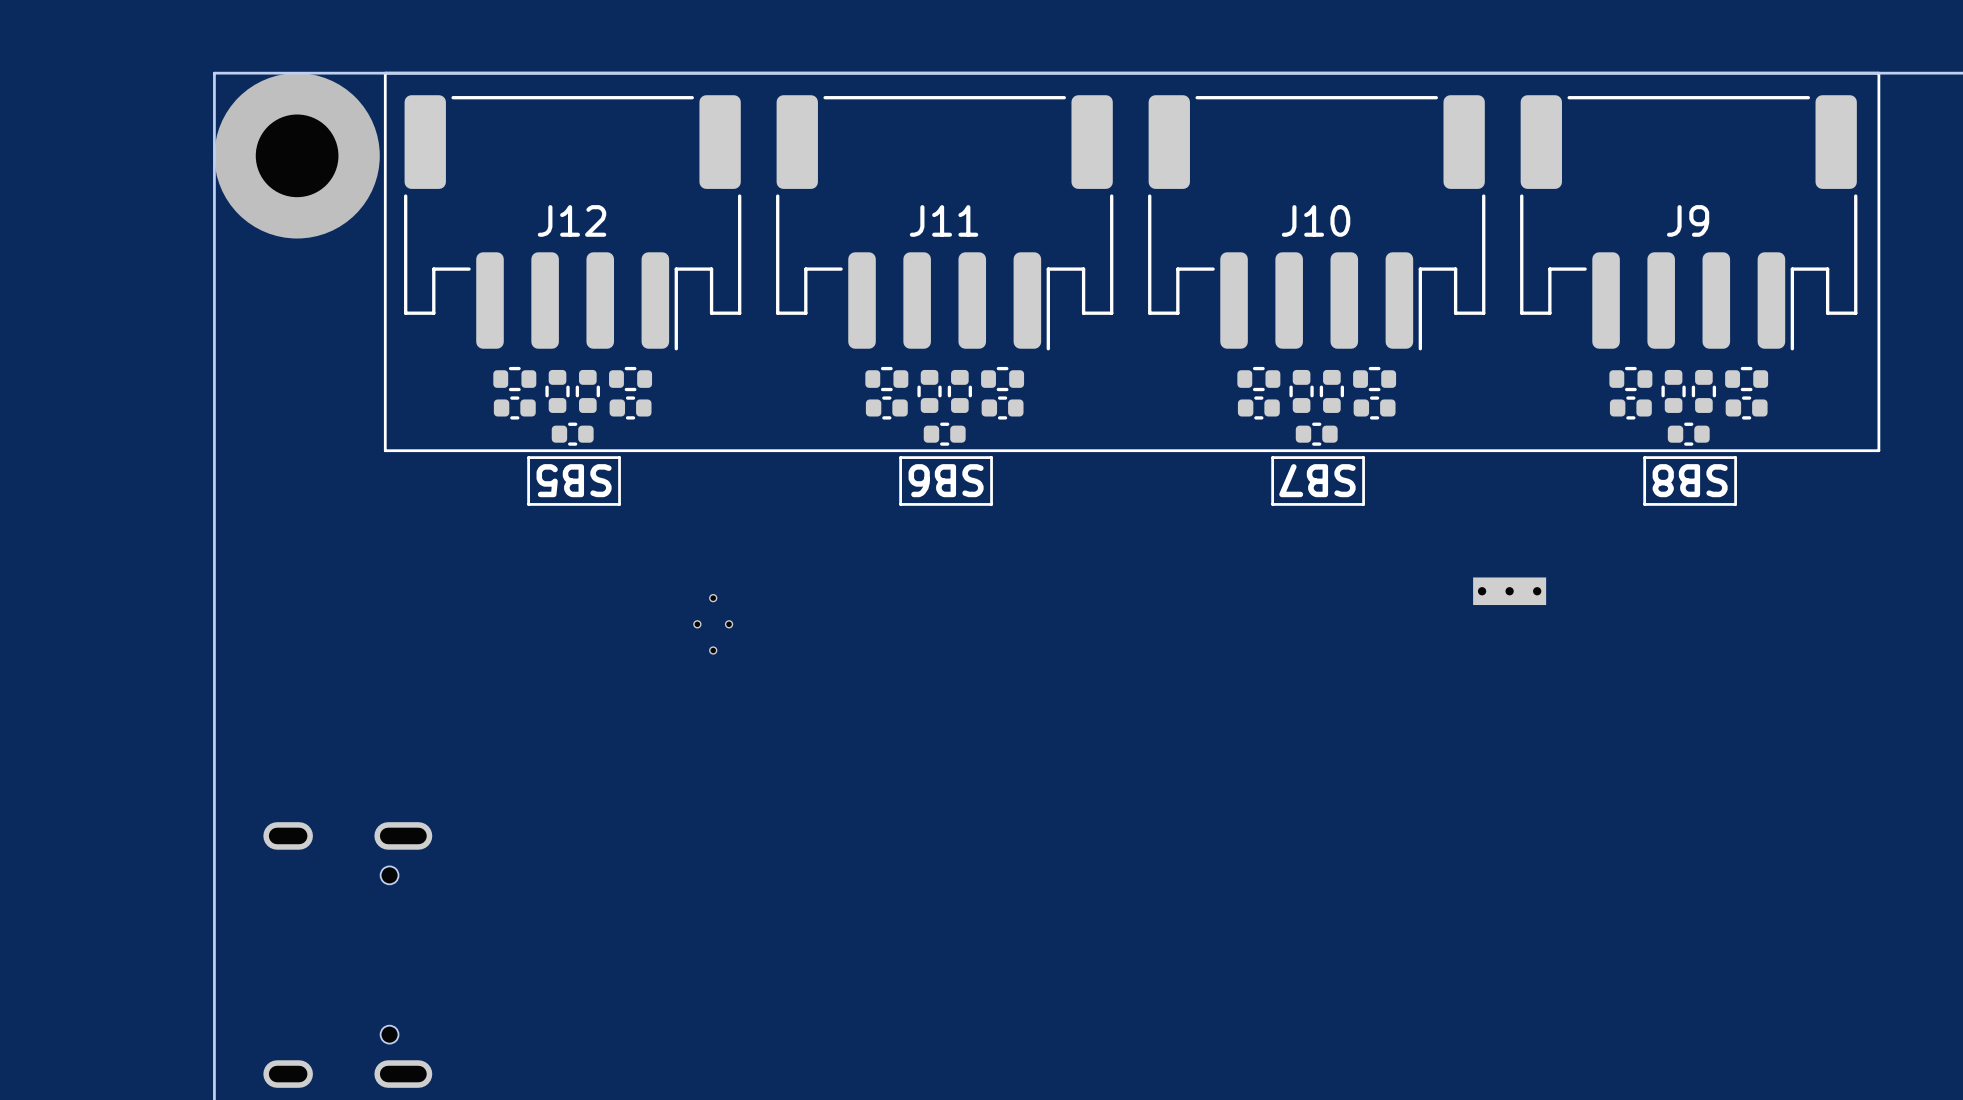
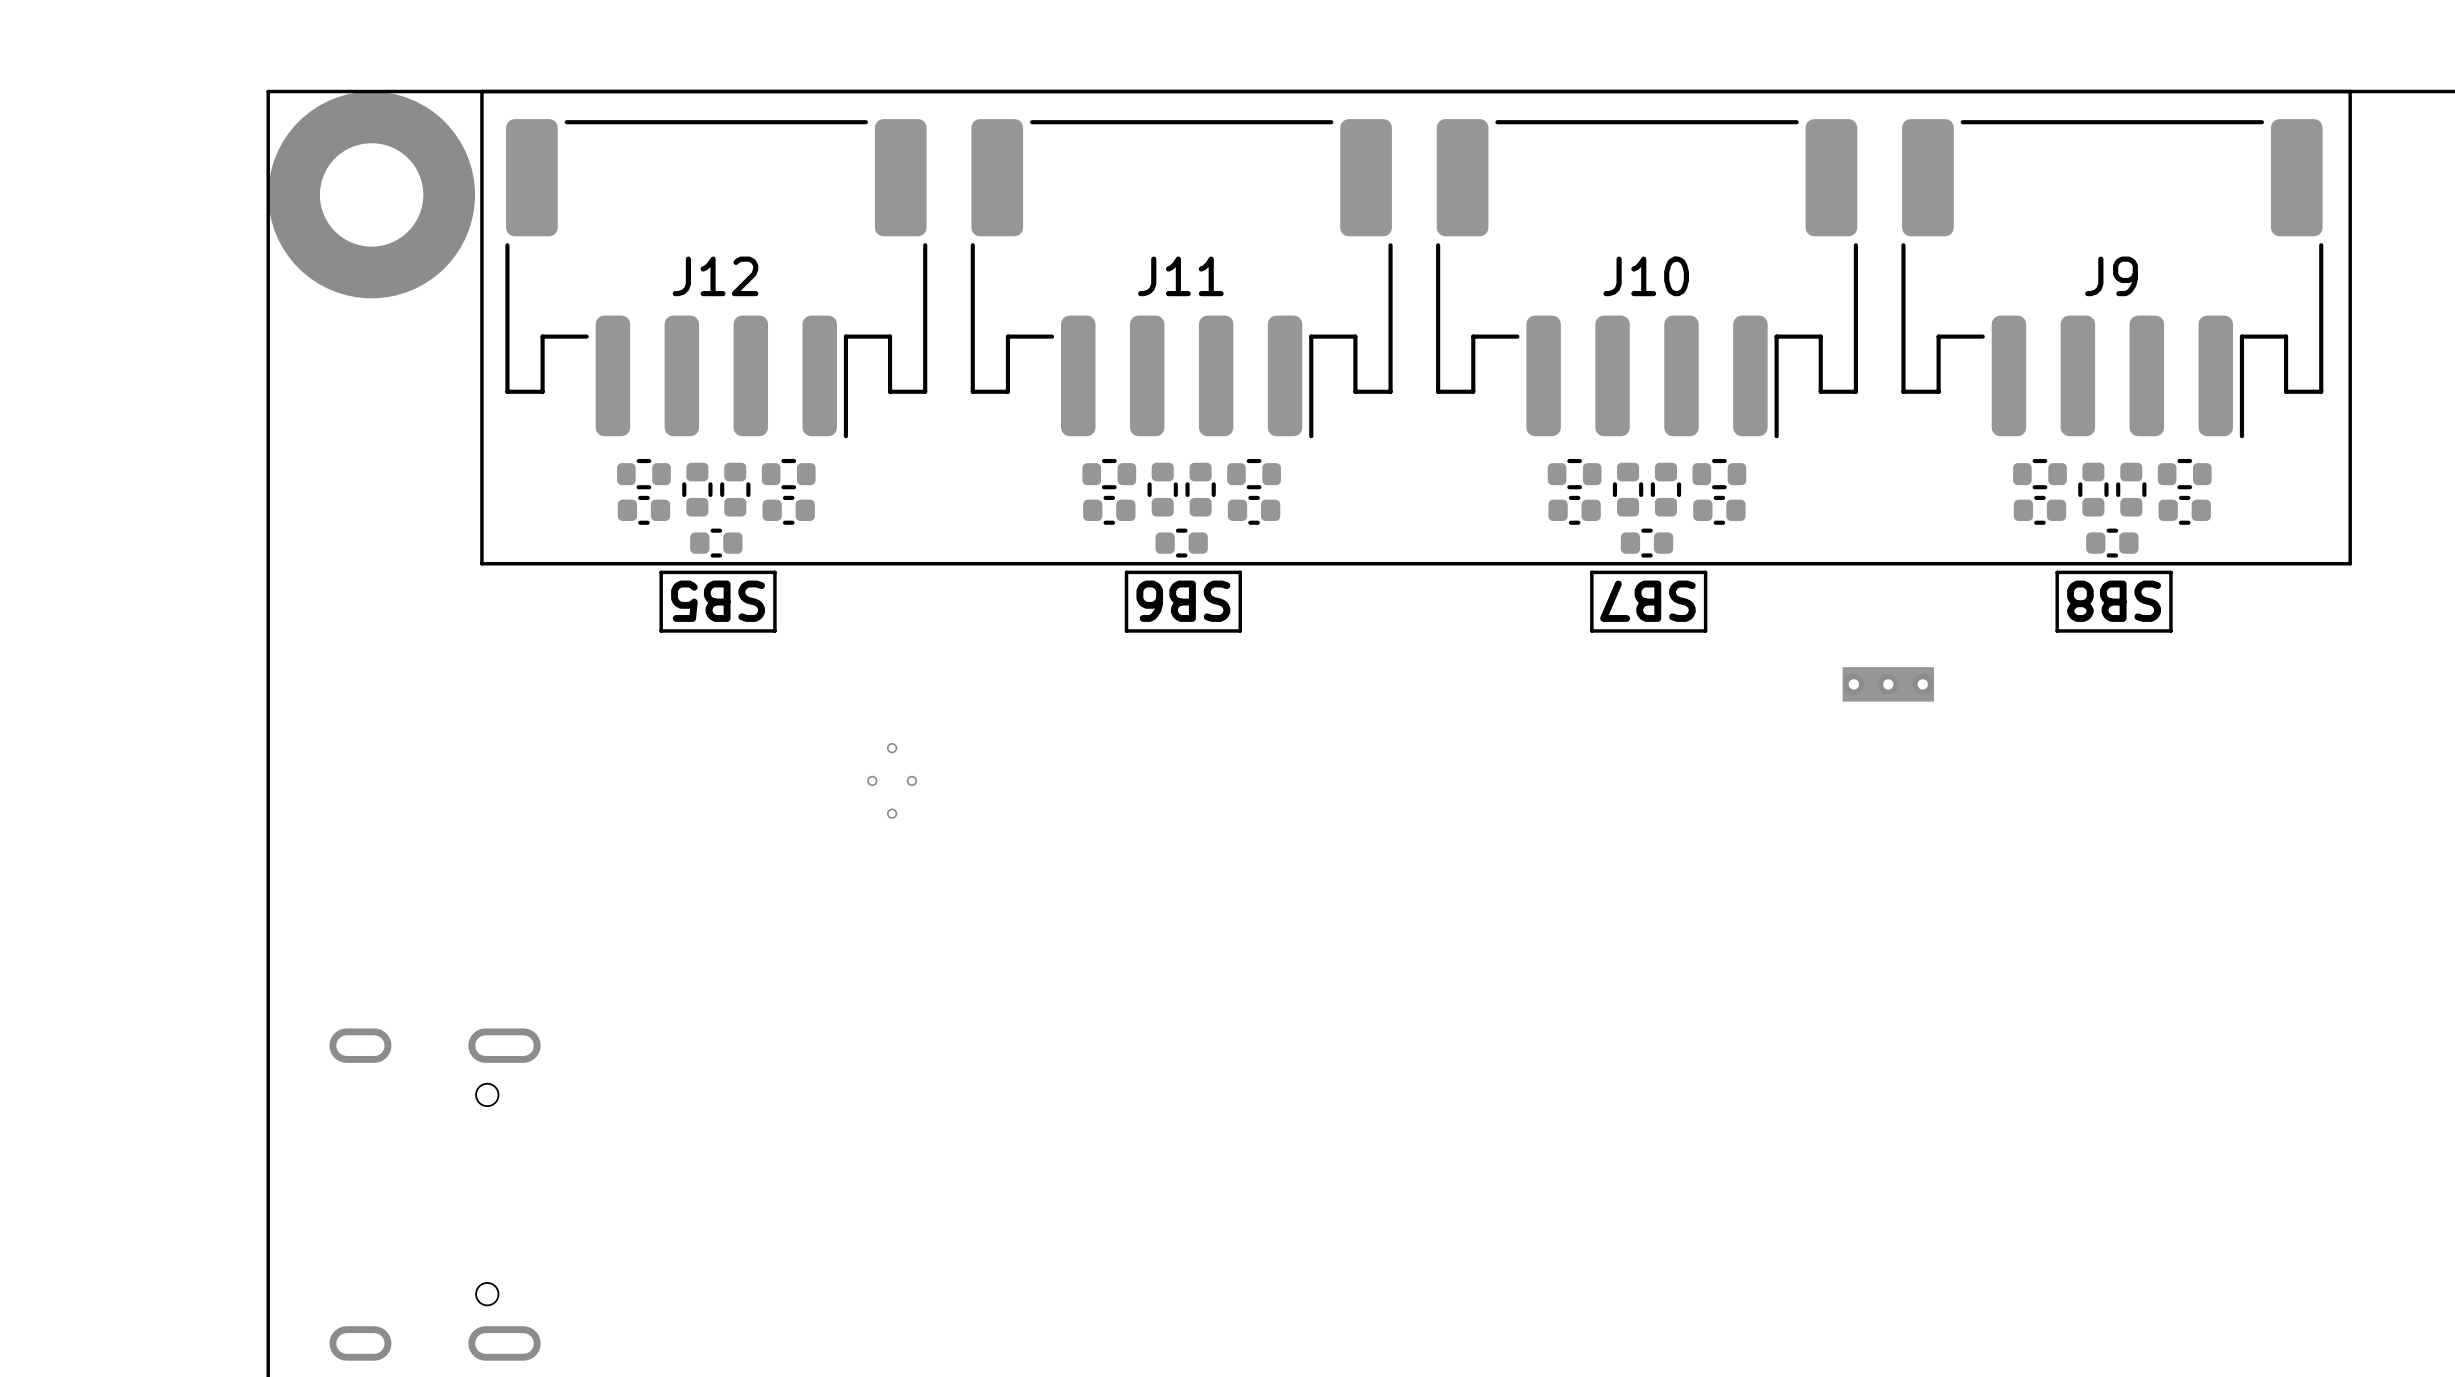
part position: (1509, 591) -> (1888, 684)

